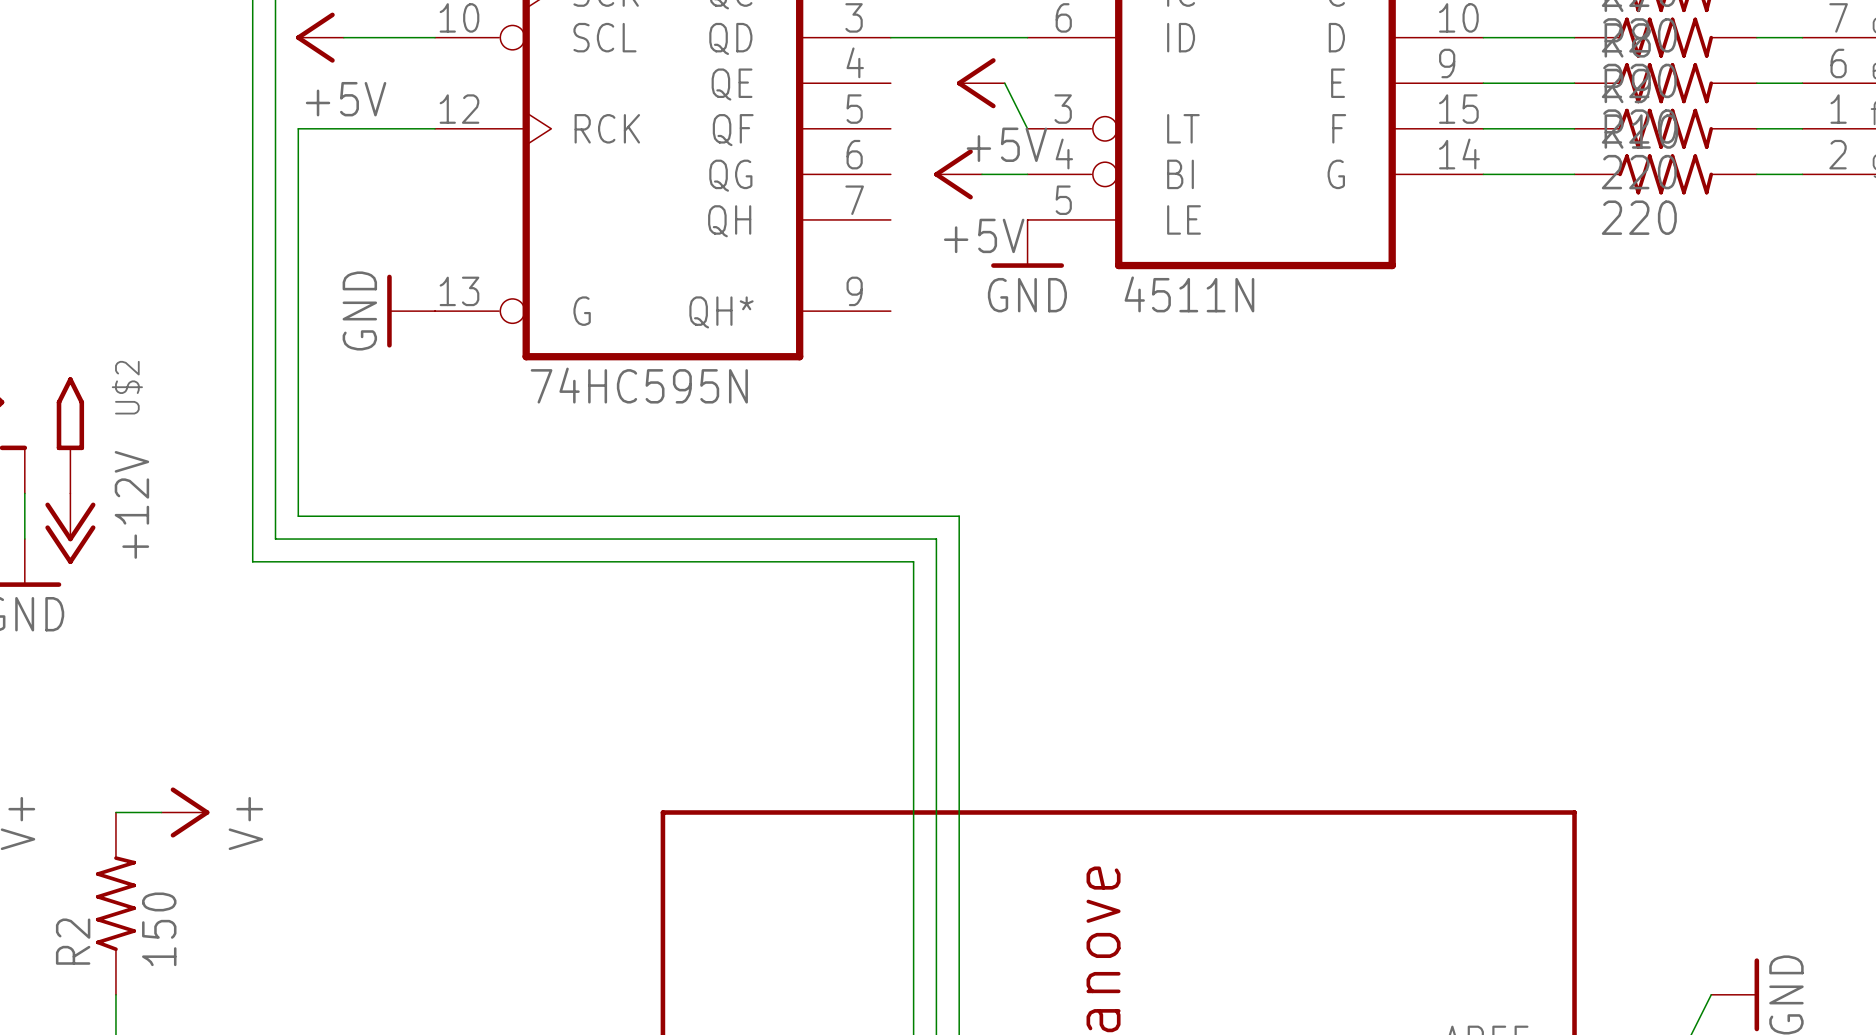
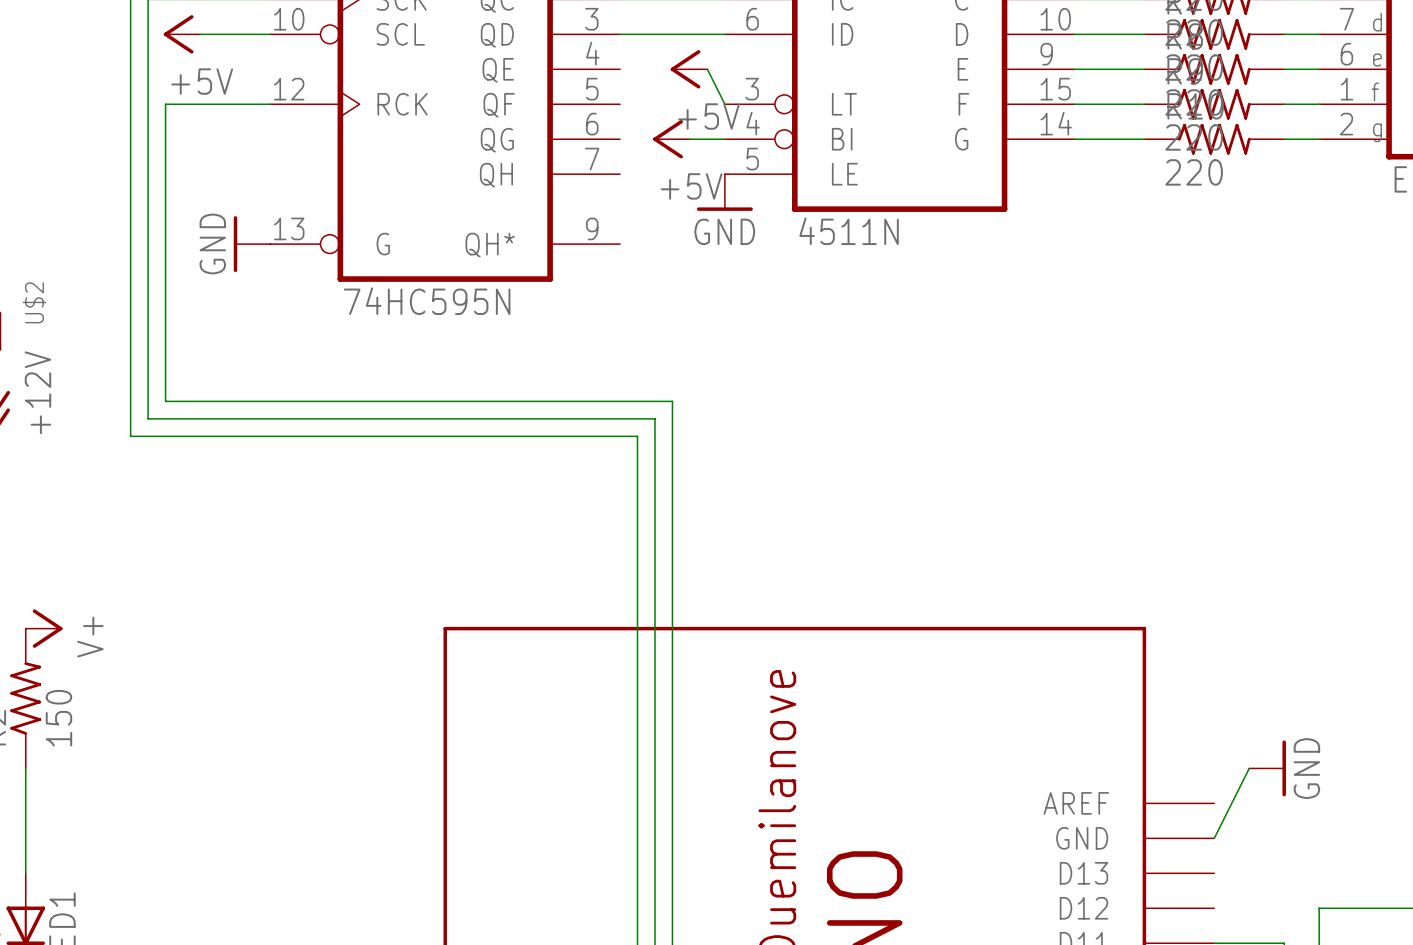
power symbol position: V+ (185, 812) -> V+ (44, 628)

